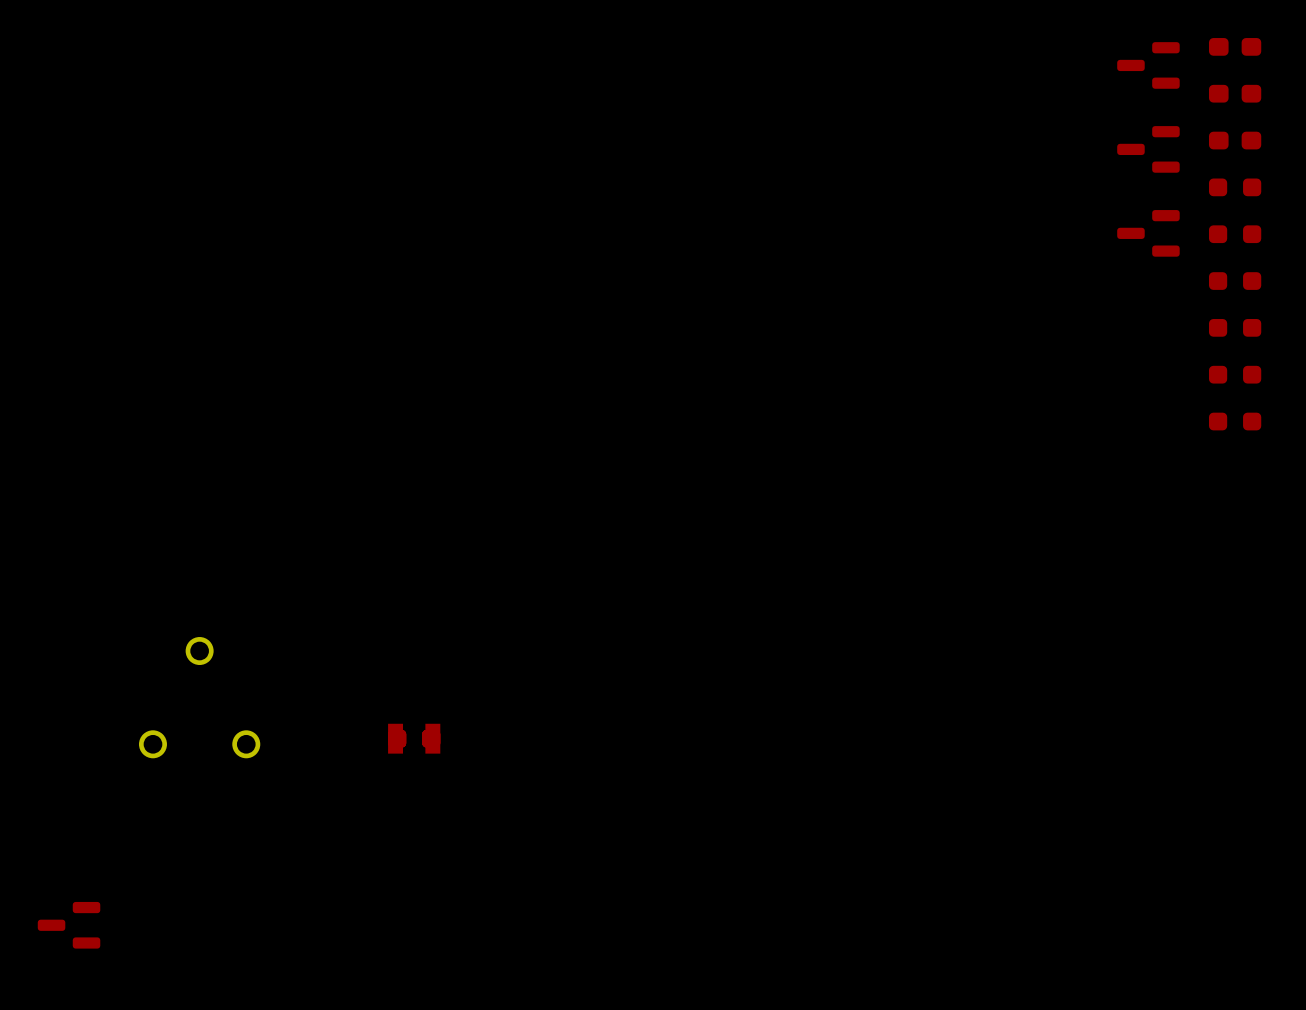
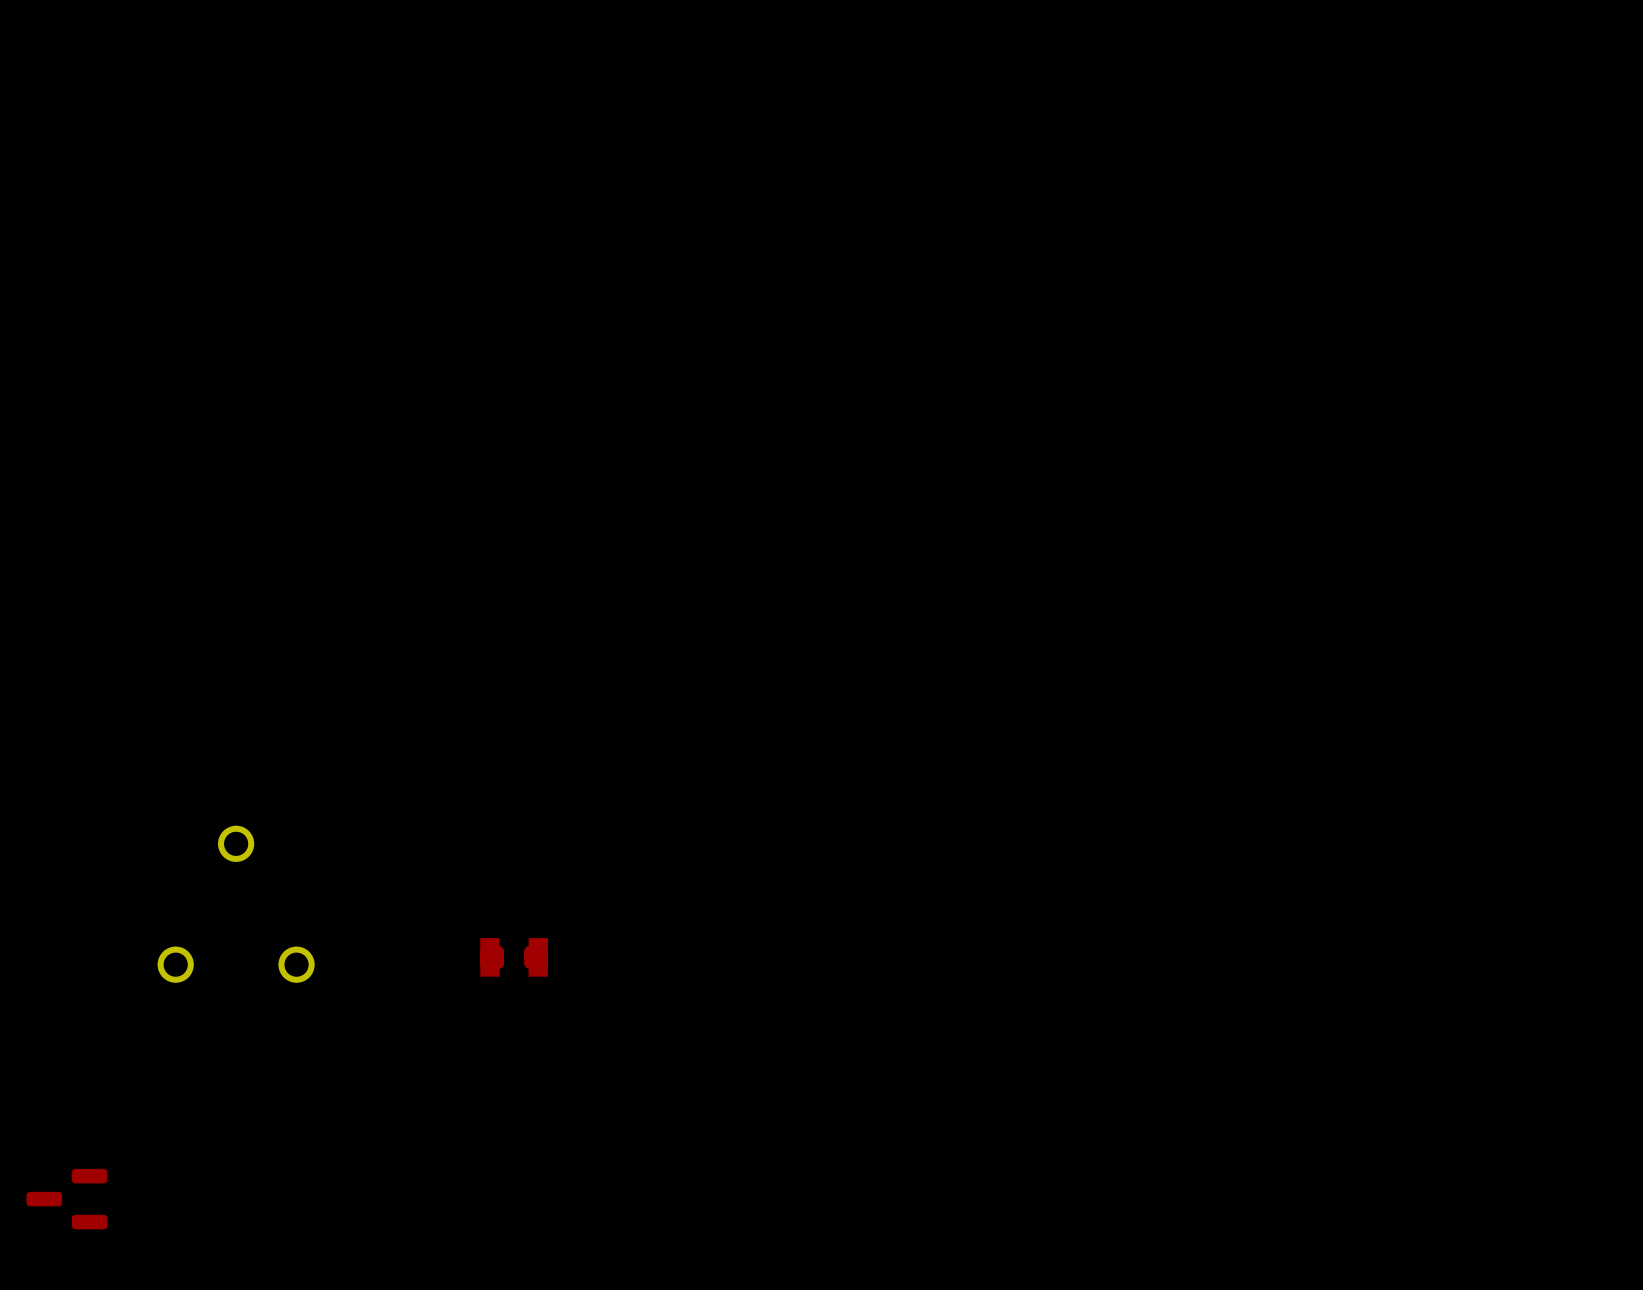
part: (1235, 46) -> none
part: (1148, 65) -> none
part: (1235, 93) -> none
part: (1235, 140) -> none
part: (1148, 149) -> none
part: (1235, 187) -> none
part: (1148, 233) -> none
part: (1235, 234) -> none
part: (1235, 281) -> none
part: (1235, 327) -> none
part: (1235, 374) -> none
part: (1235, 421) -> none

